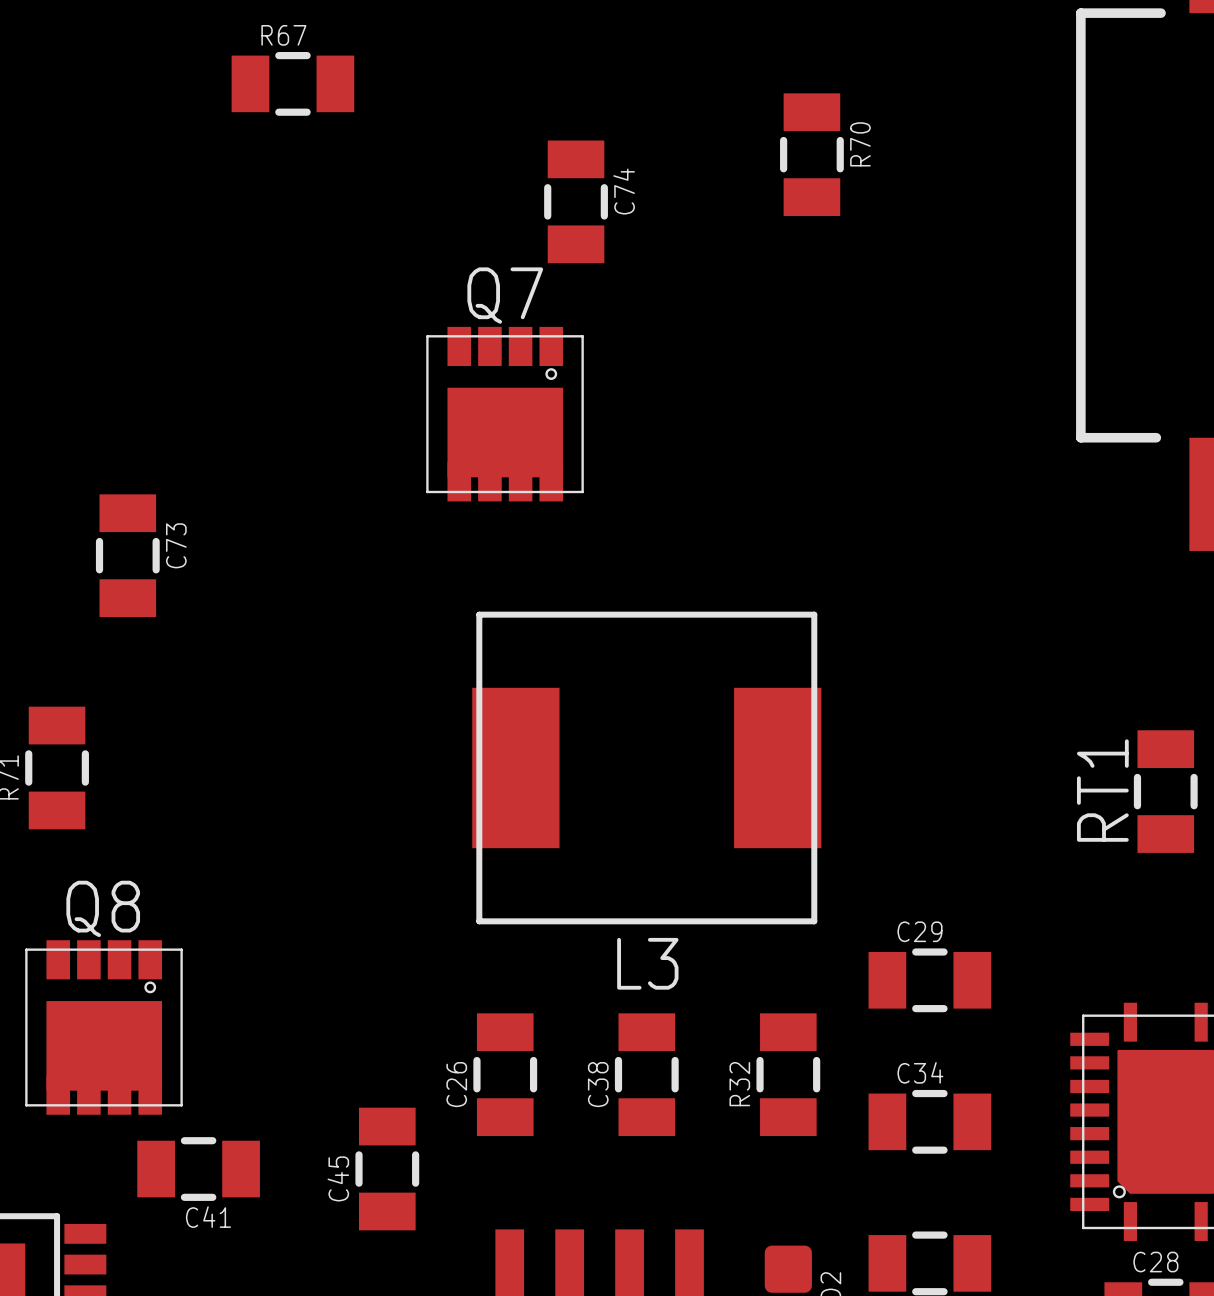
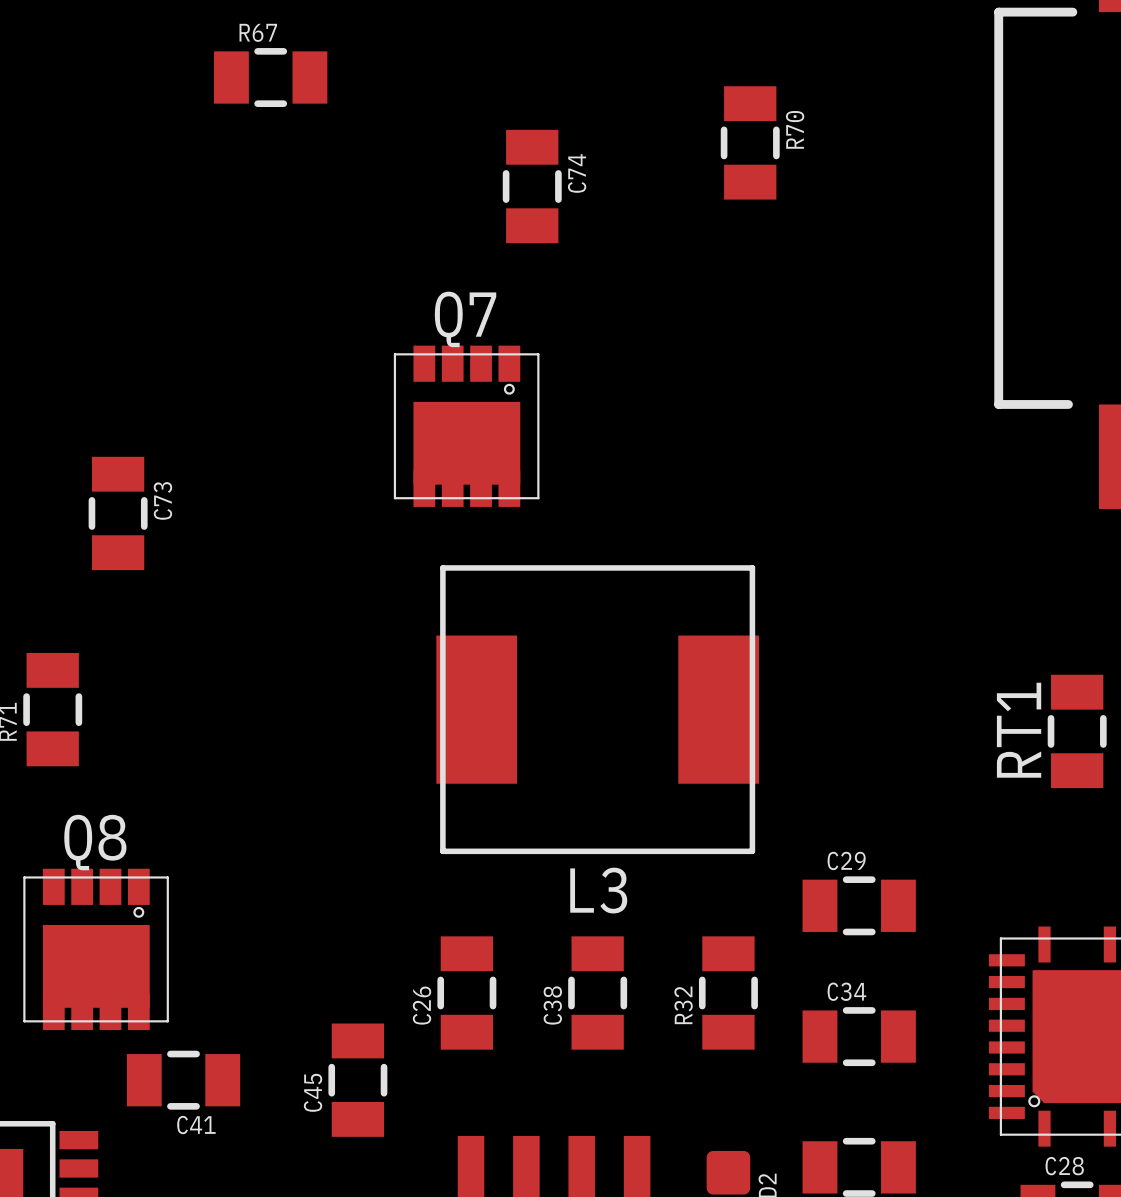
Q7 position: (505, 414) -> (466, 426)

